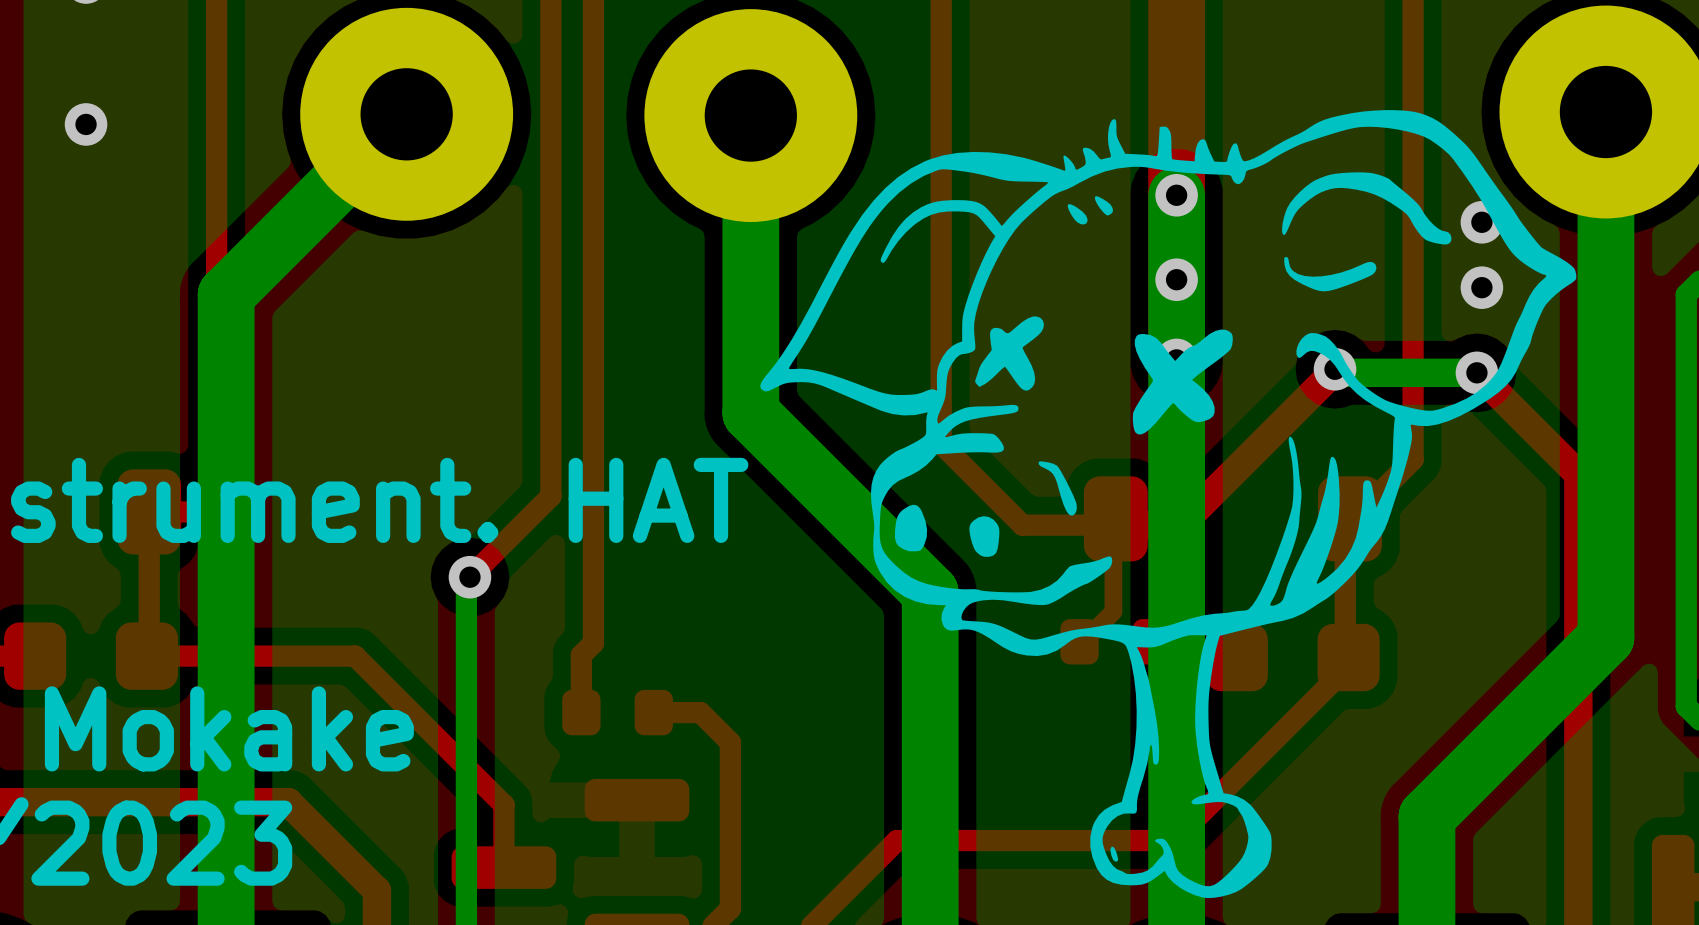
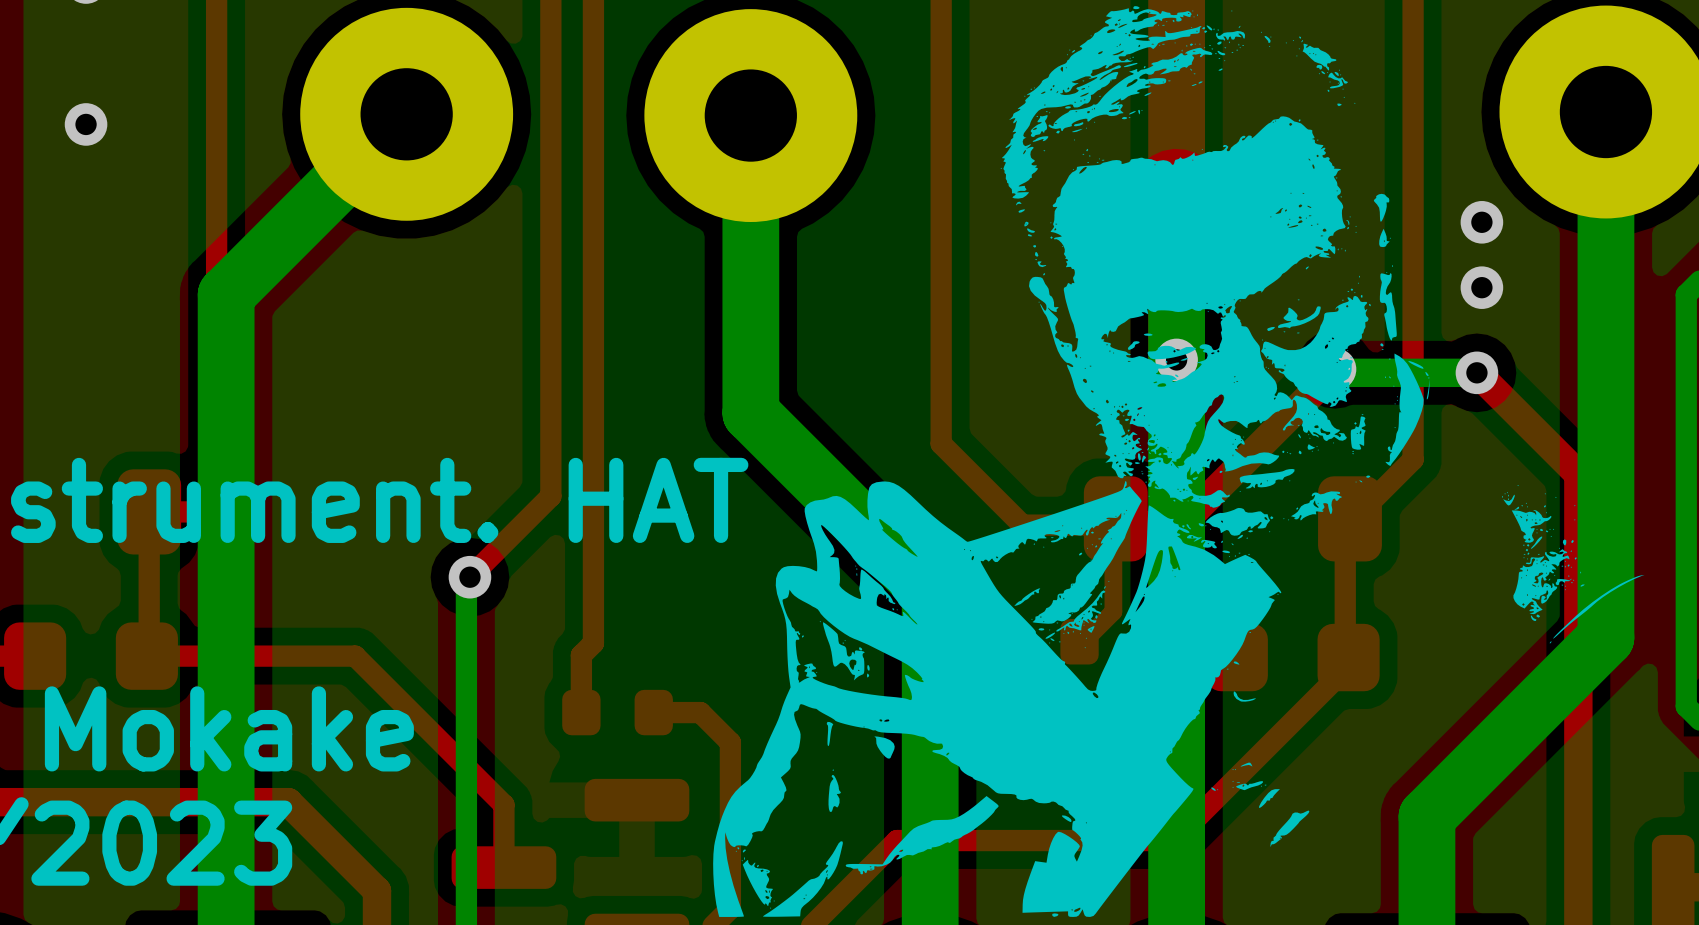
drawing shape: [760, 110, 1577, 899] -> [713, 6, 1645, 917]

